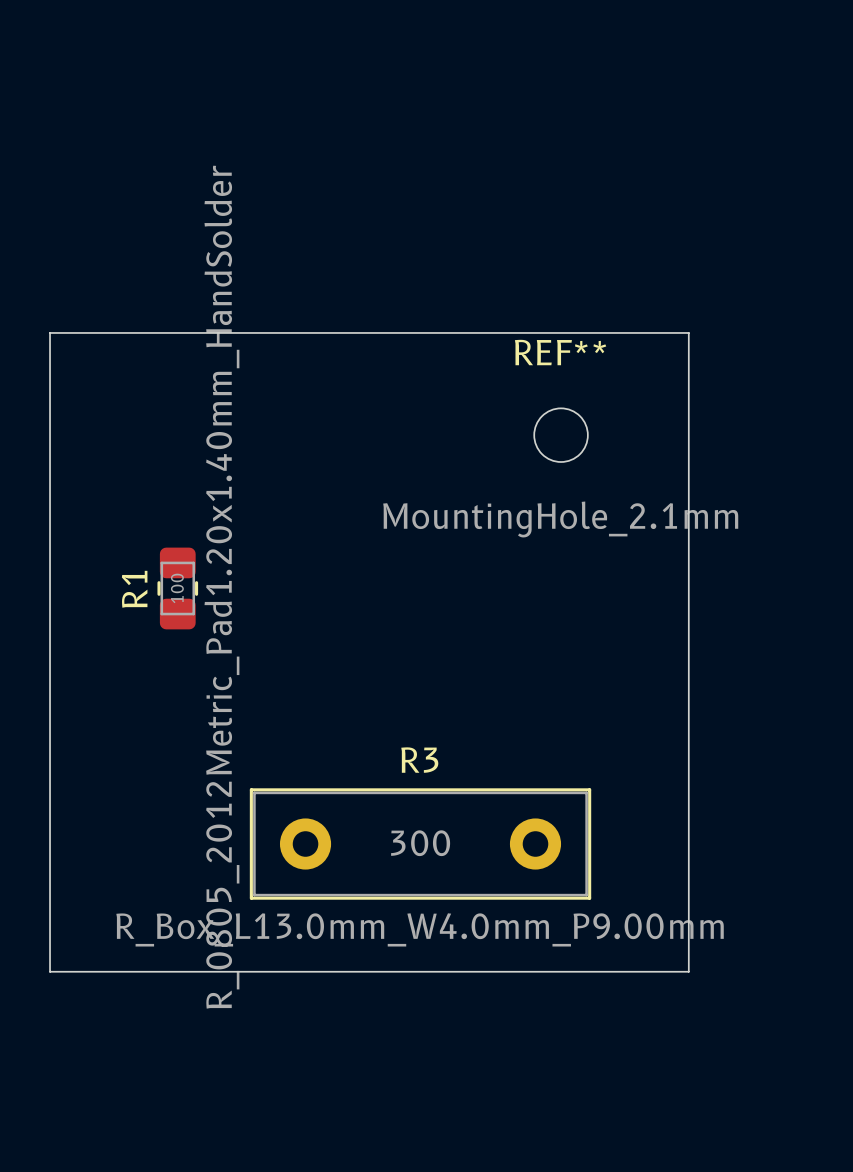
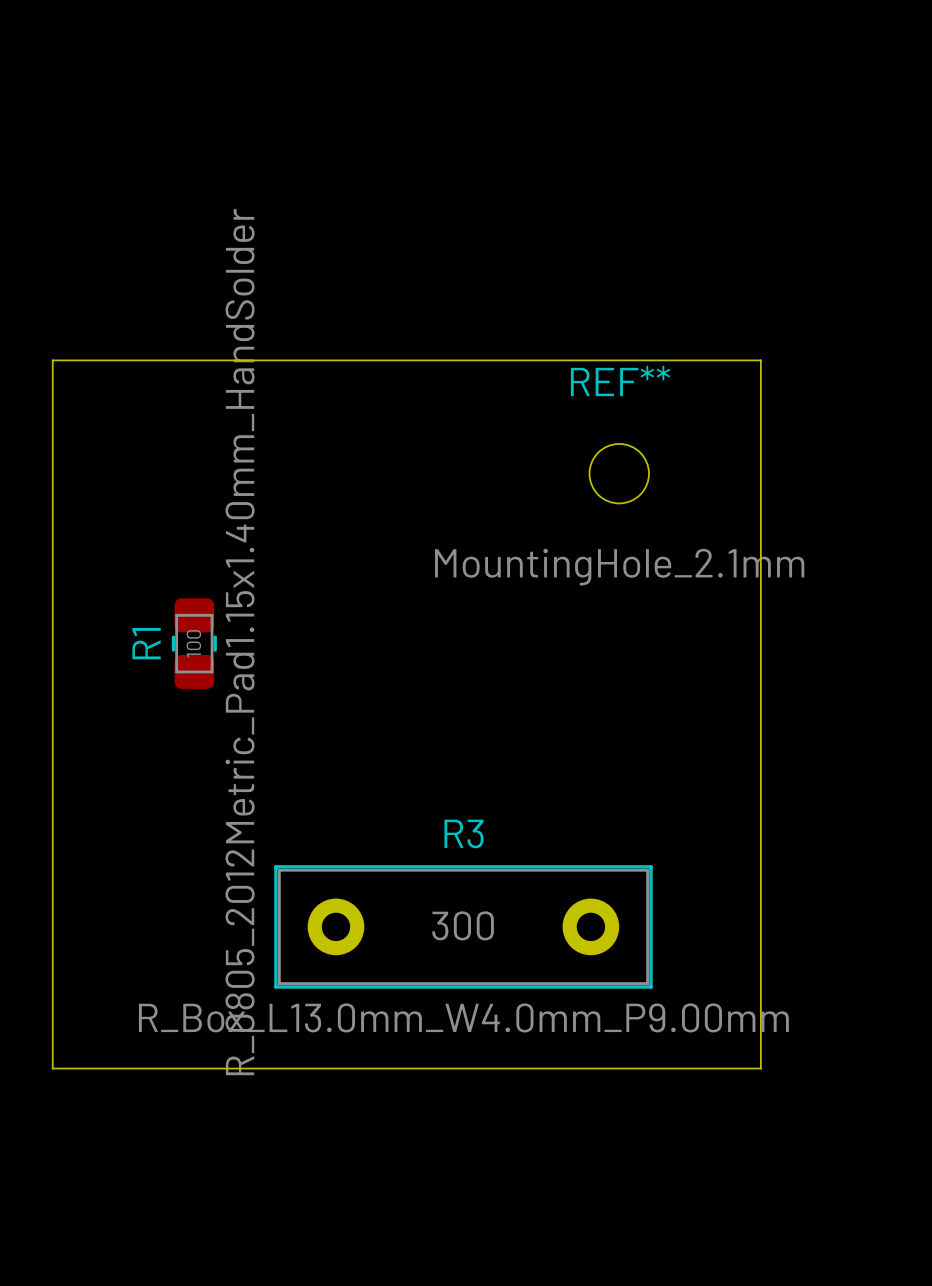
R1 value: R_0805_2012Metric_Pad1.20x1.40mm_HandSolder (221, 587) -> R_0805_2012Metric_Pad1.15x1.40mm_HandSolder (240, 642)

